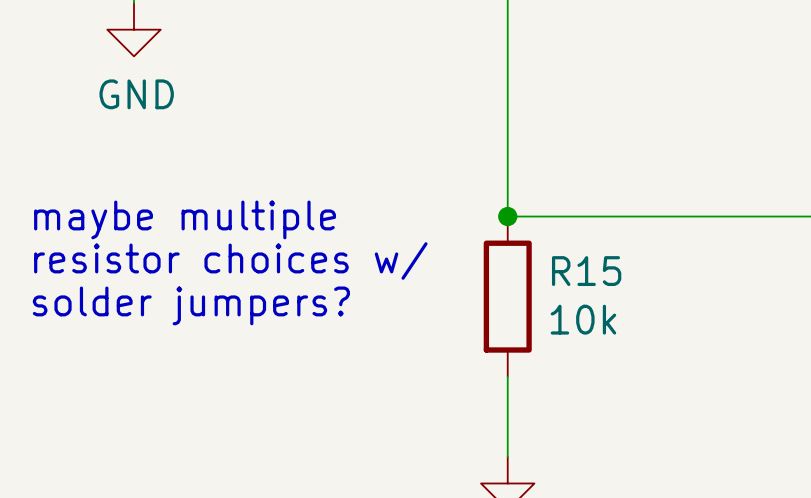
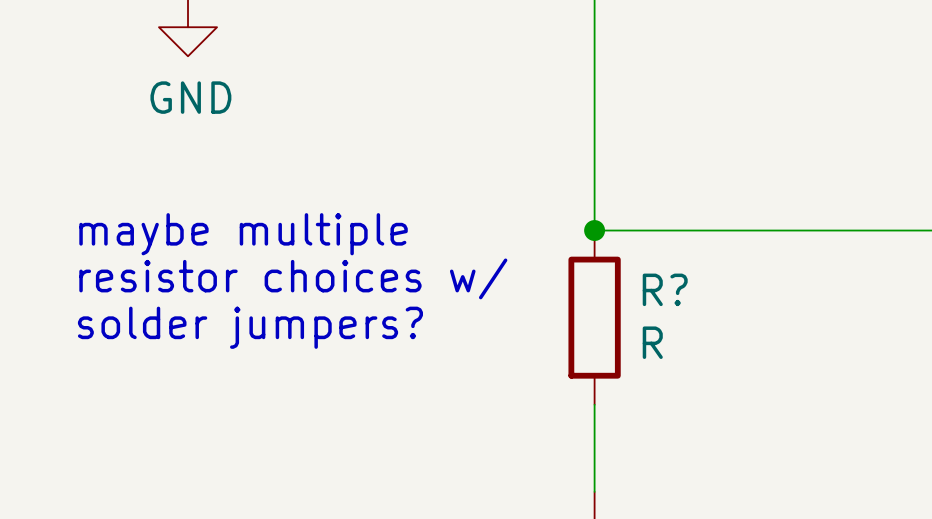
R15 name: R15 (586, 271) -> R? (665, 289)
R15 value: 10k (583, 319) -> R (652, 342)

